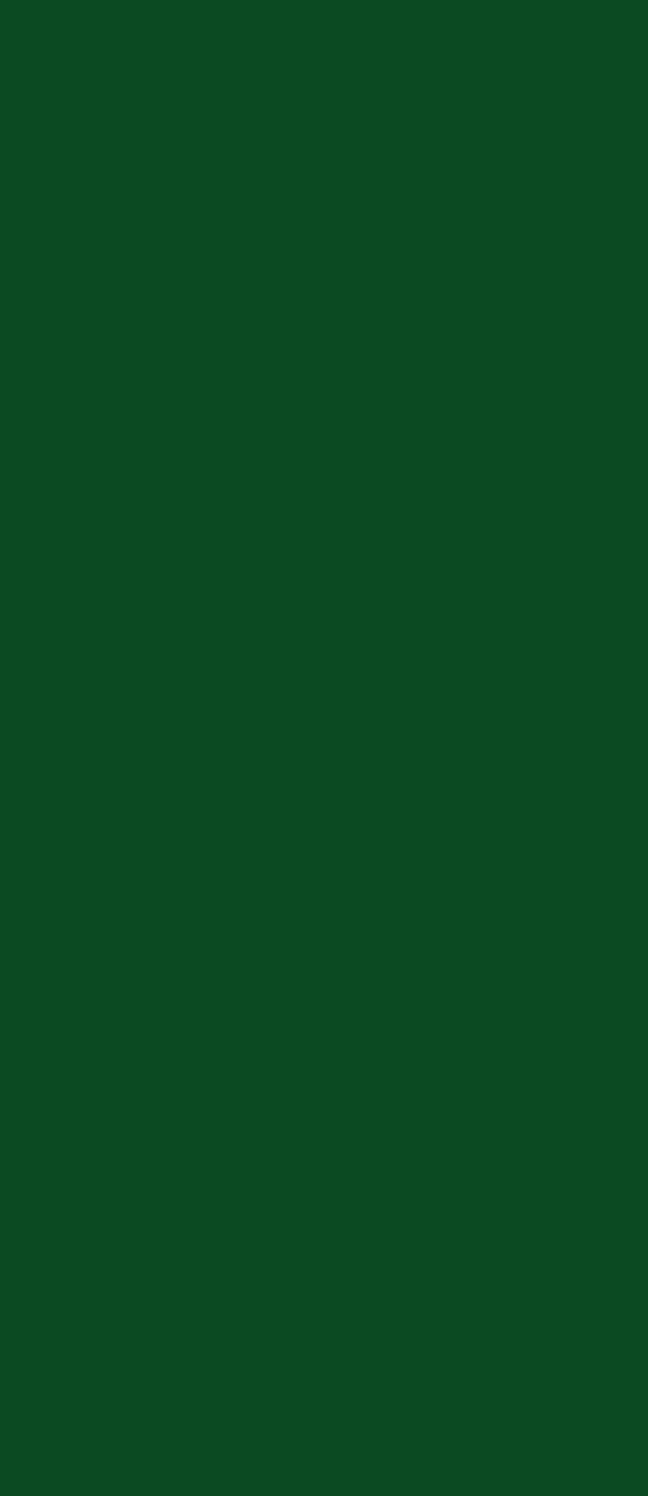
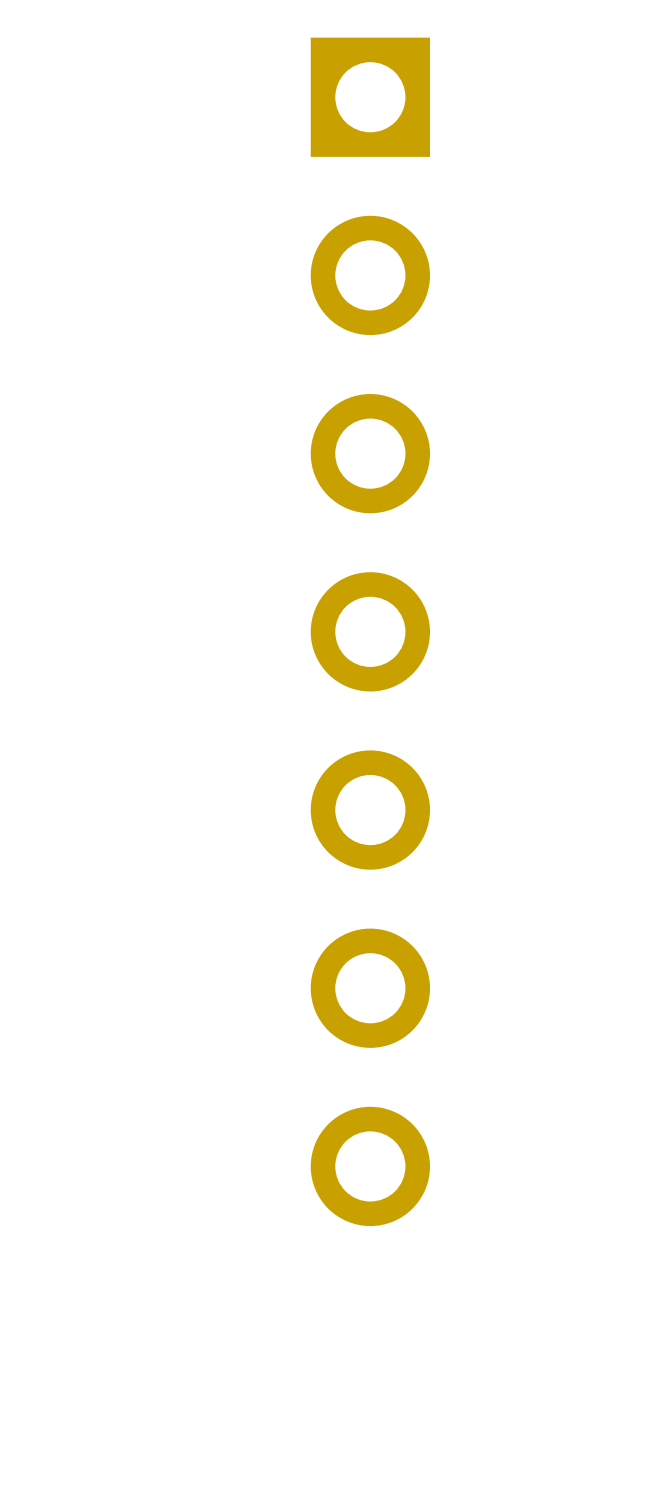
part: none -> (370, 631)

